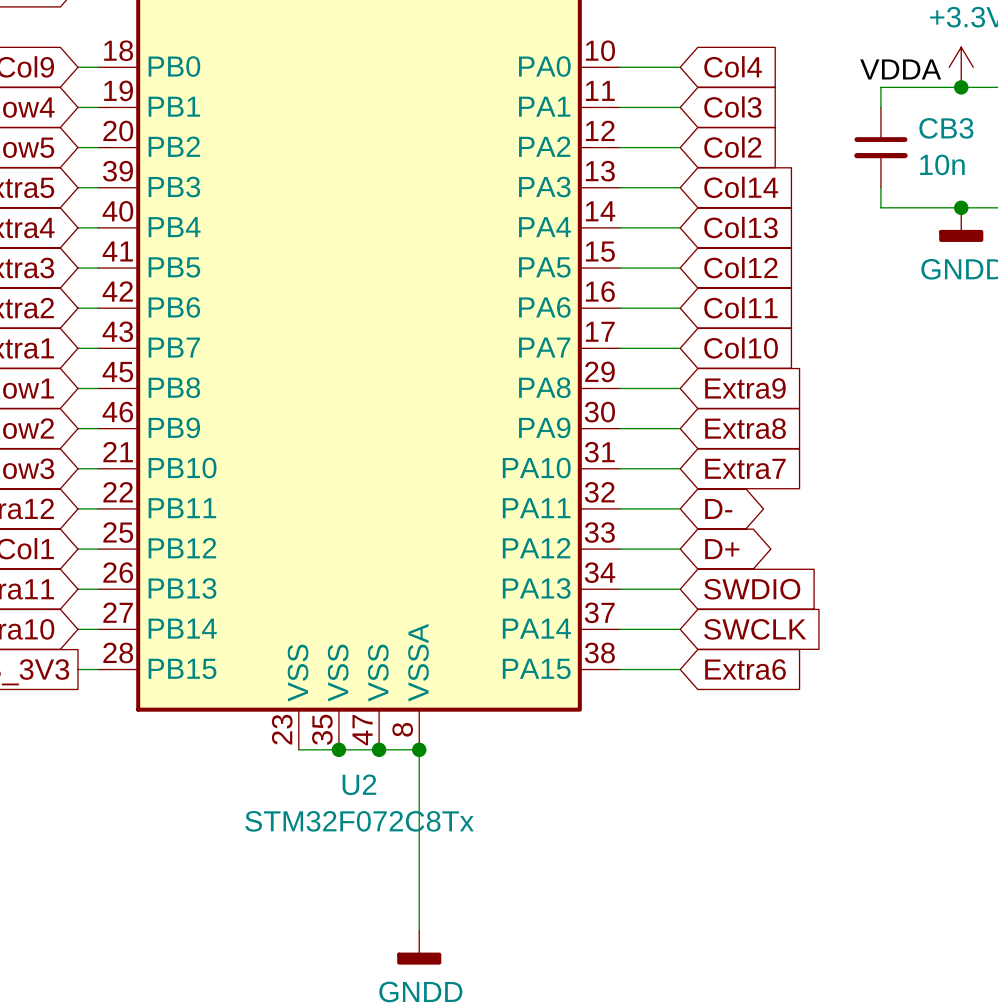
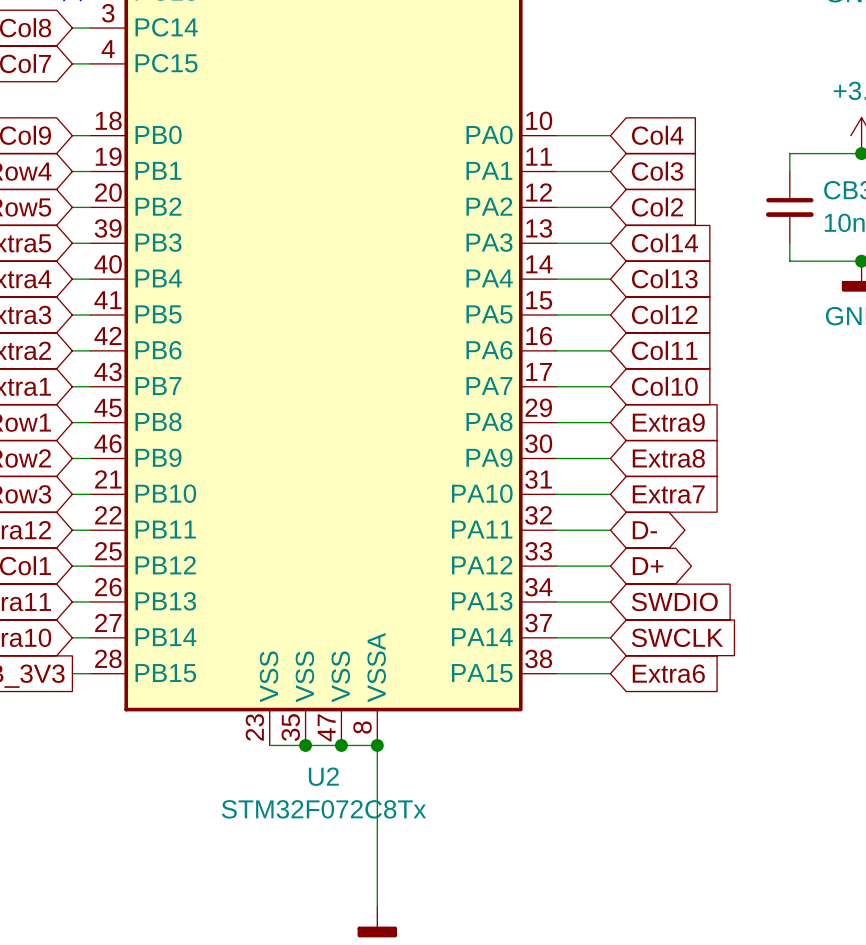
label: VDDA (900, 69) -> none

